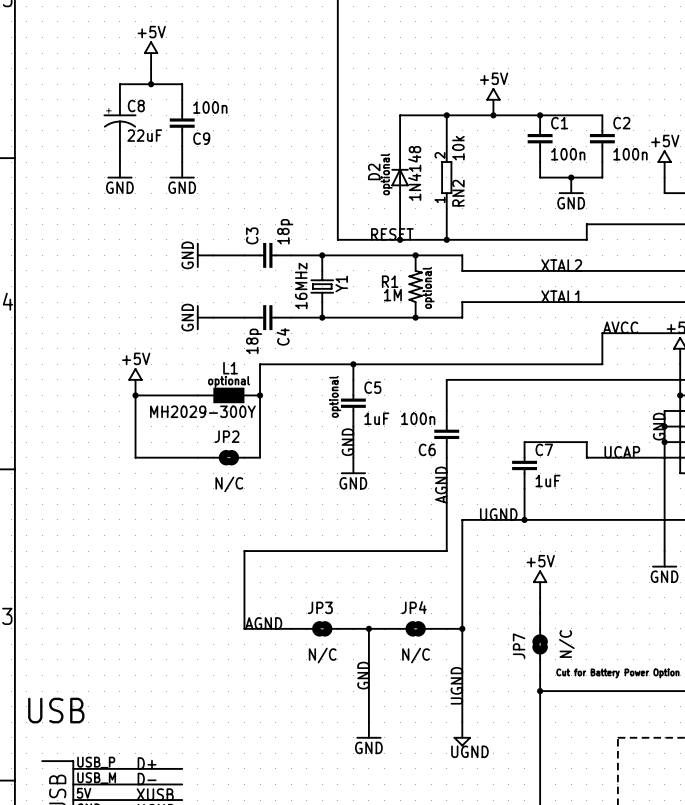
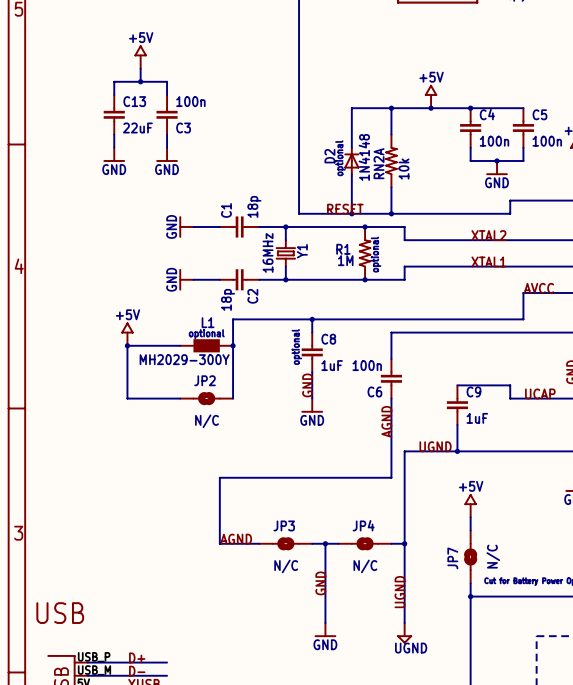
C8: 22uF (119, 123) -> none
C13: none -> 22uF (114, 114)
C1 name: C1 (559, 123) -> C4 (487, 114)
C2 name: C2 (621, 123) -> C5 (539, 114)
C9 name: C9 (201, 138) -> C3 (183, 127)
RN2: 10k (446, 177) -> none
RN2A: none -> 10k (391, 160)
C3 name: C3 (252, 235) -> C1 (226, 210)
C4 name: C4 (283, 336) -> C2 (252, 296)
C5 name: C5 (372, 387) -> C8 (328, 339)
C7 name: C7 (544, 449) -> C9 (473, 391)

